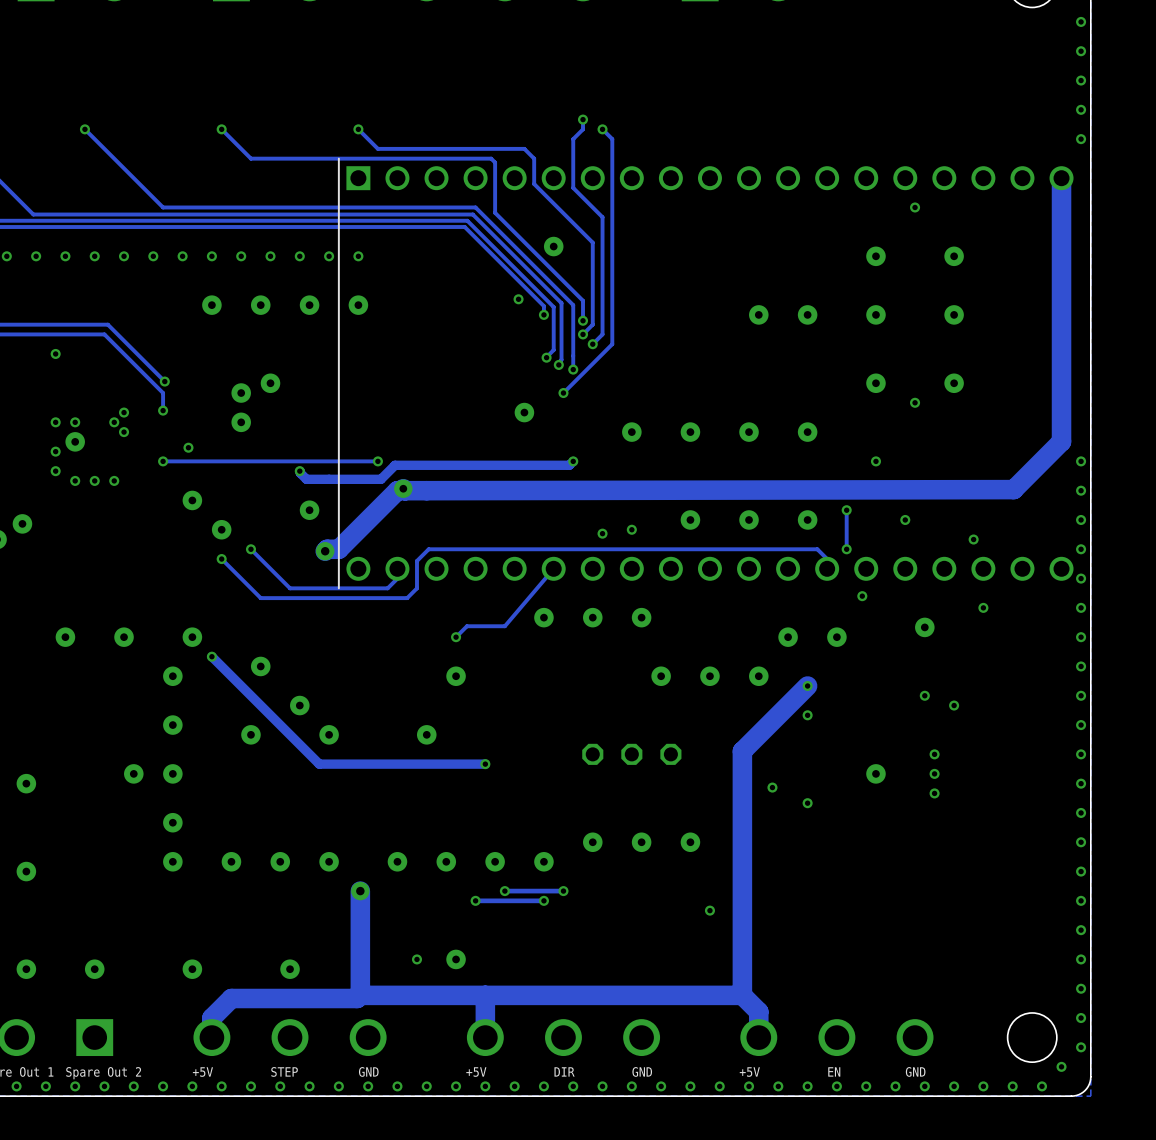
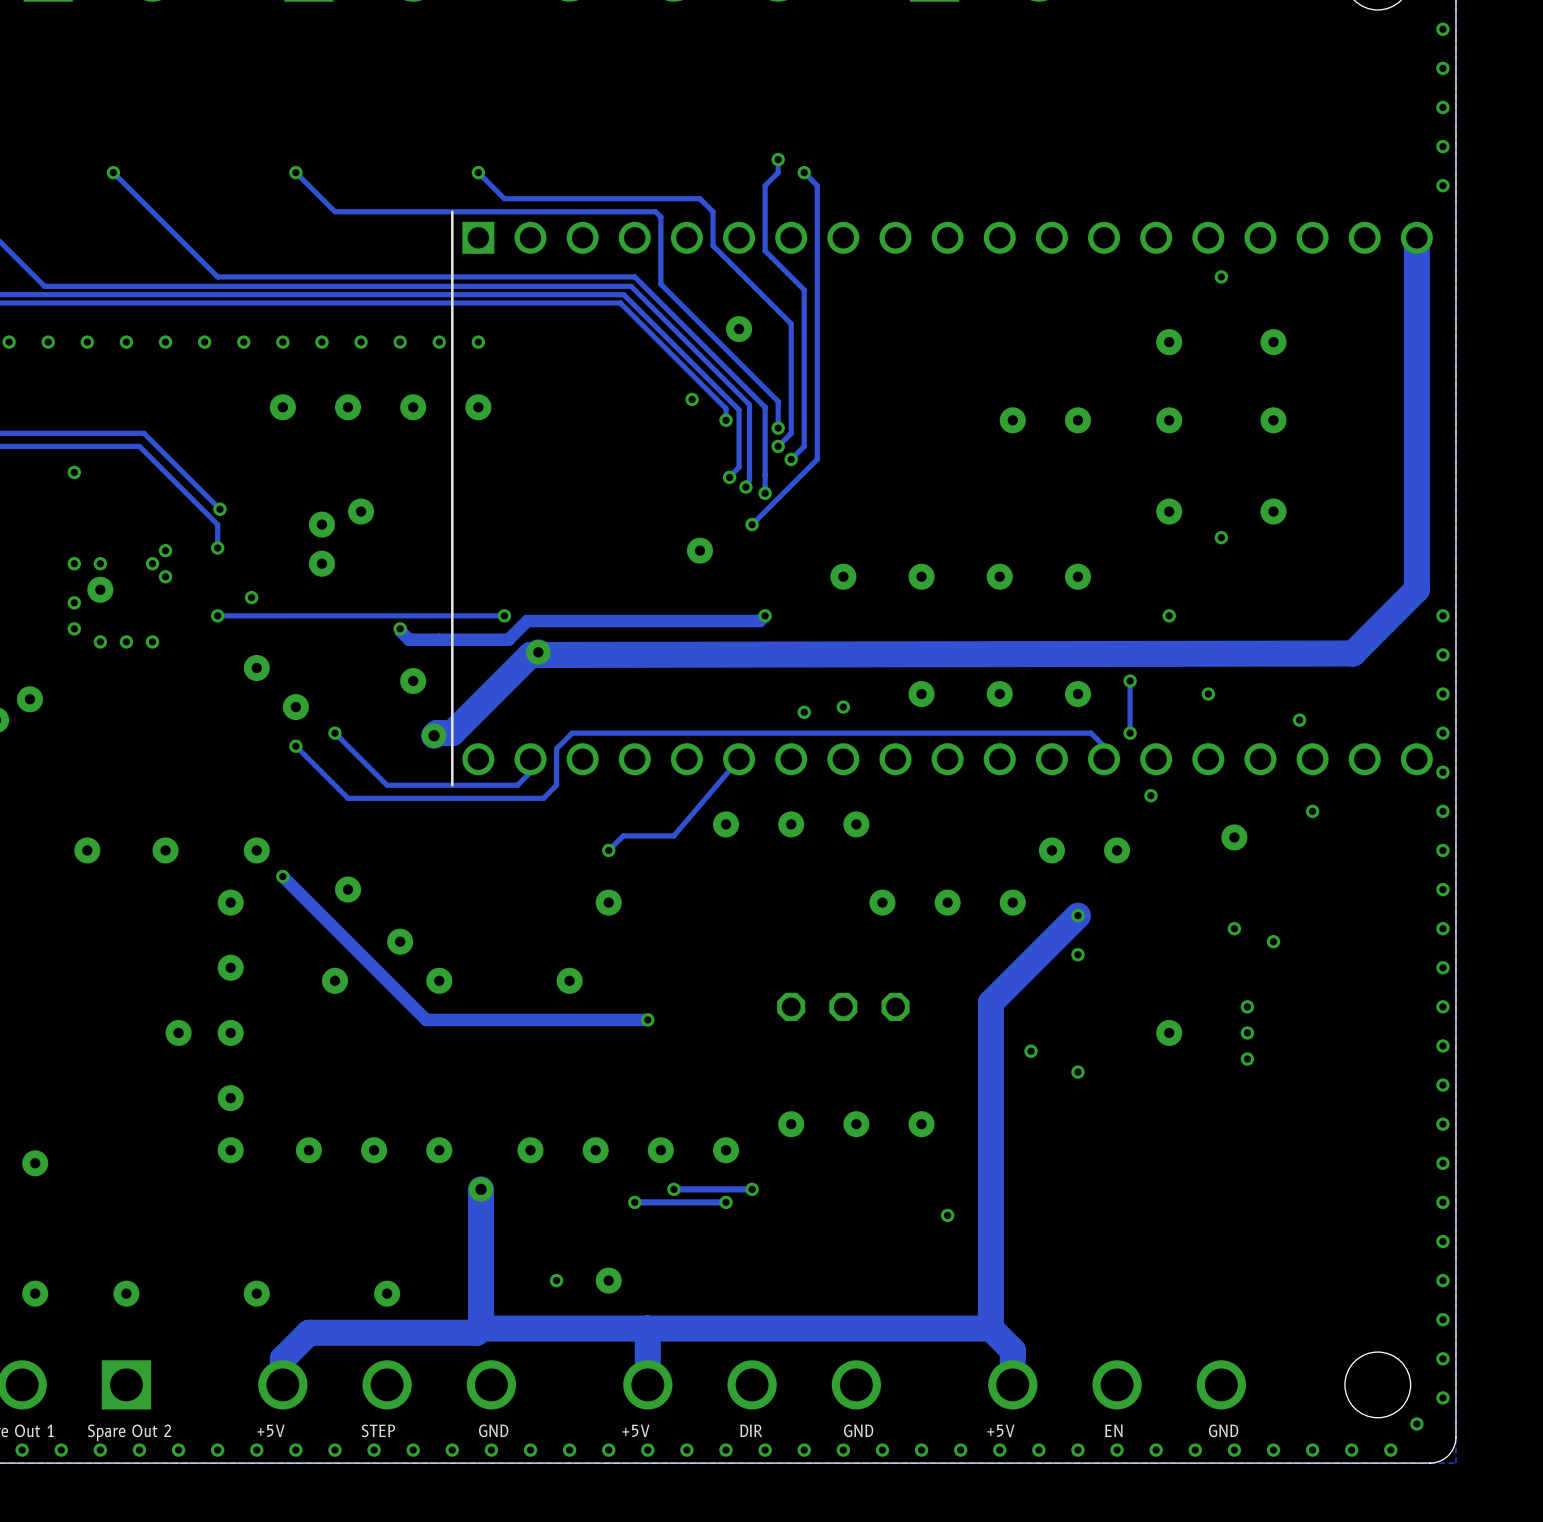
via: (26, 783) -> none

